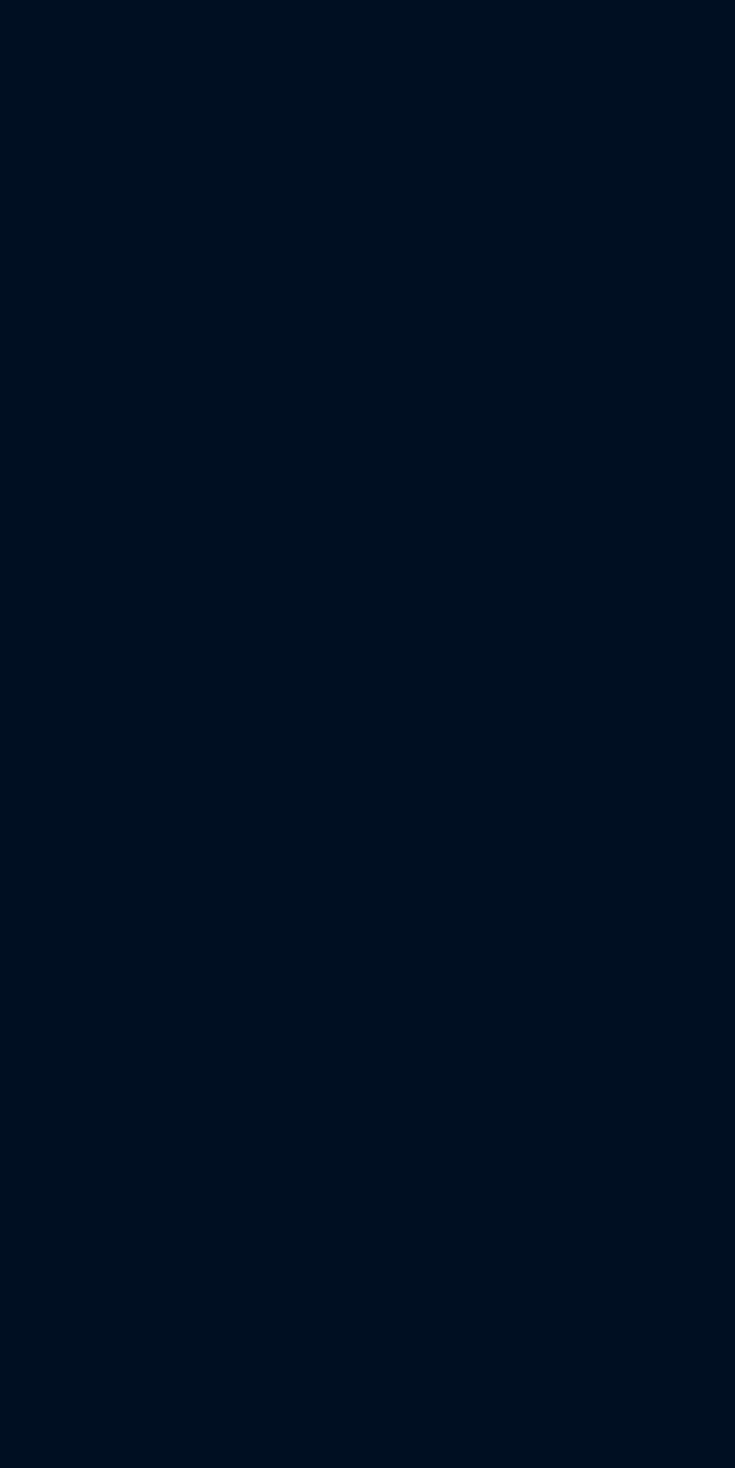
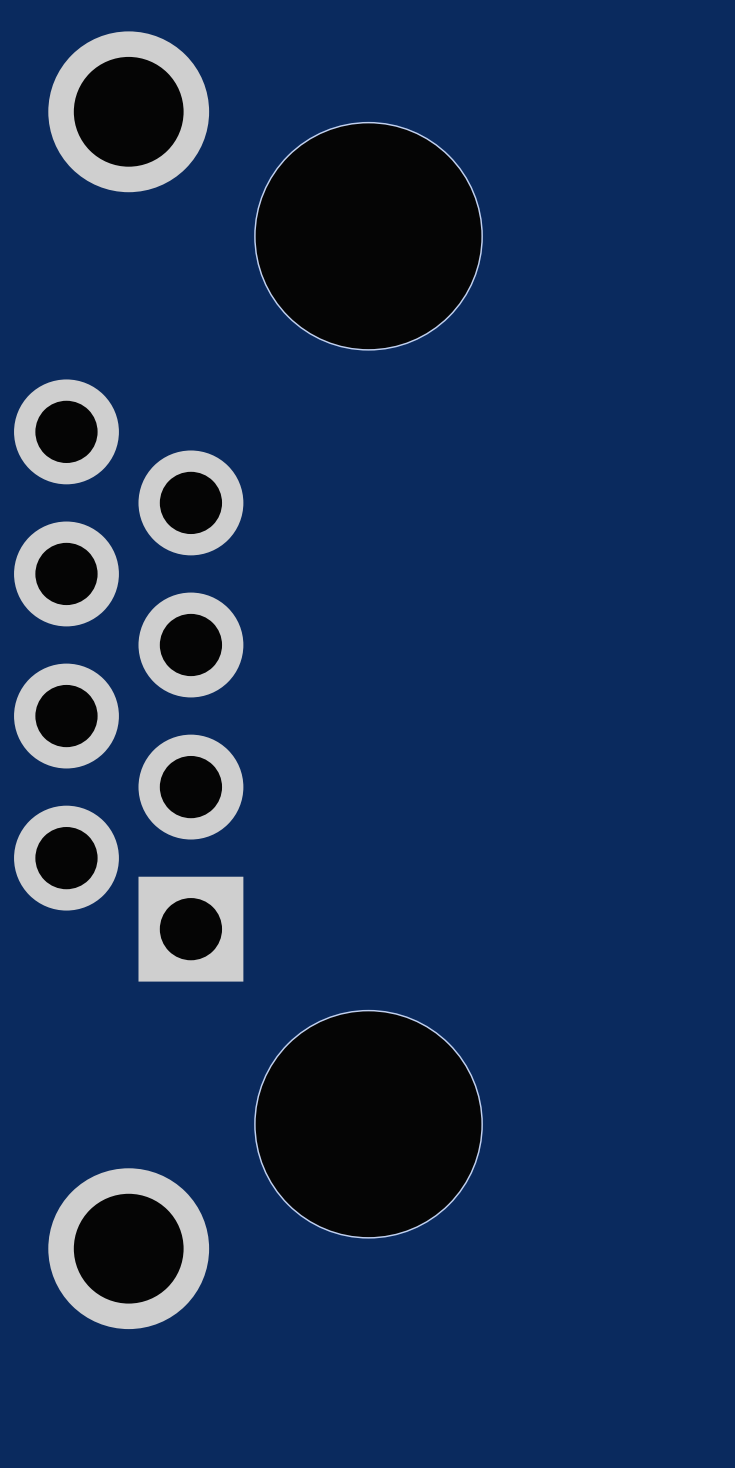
part: none -> (248, 680)

